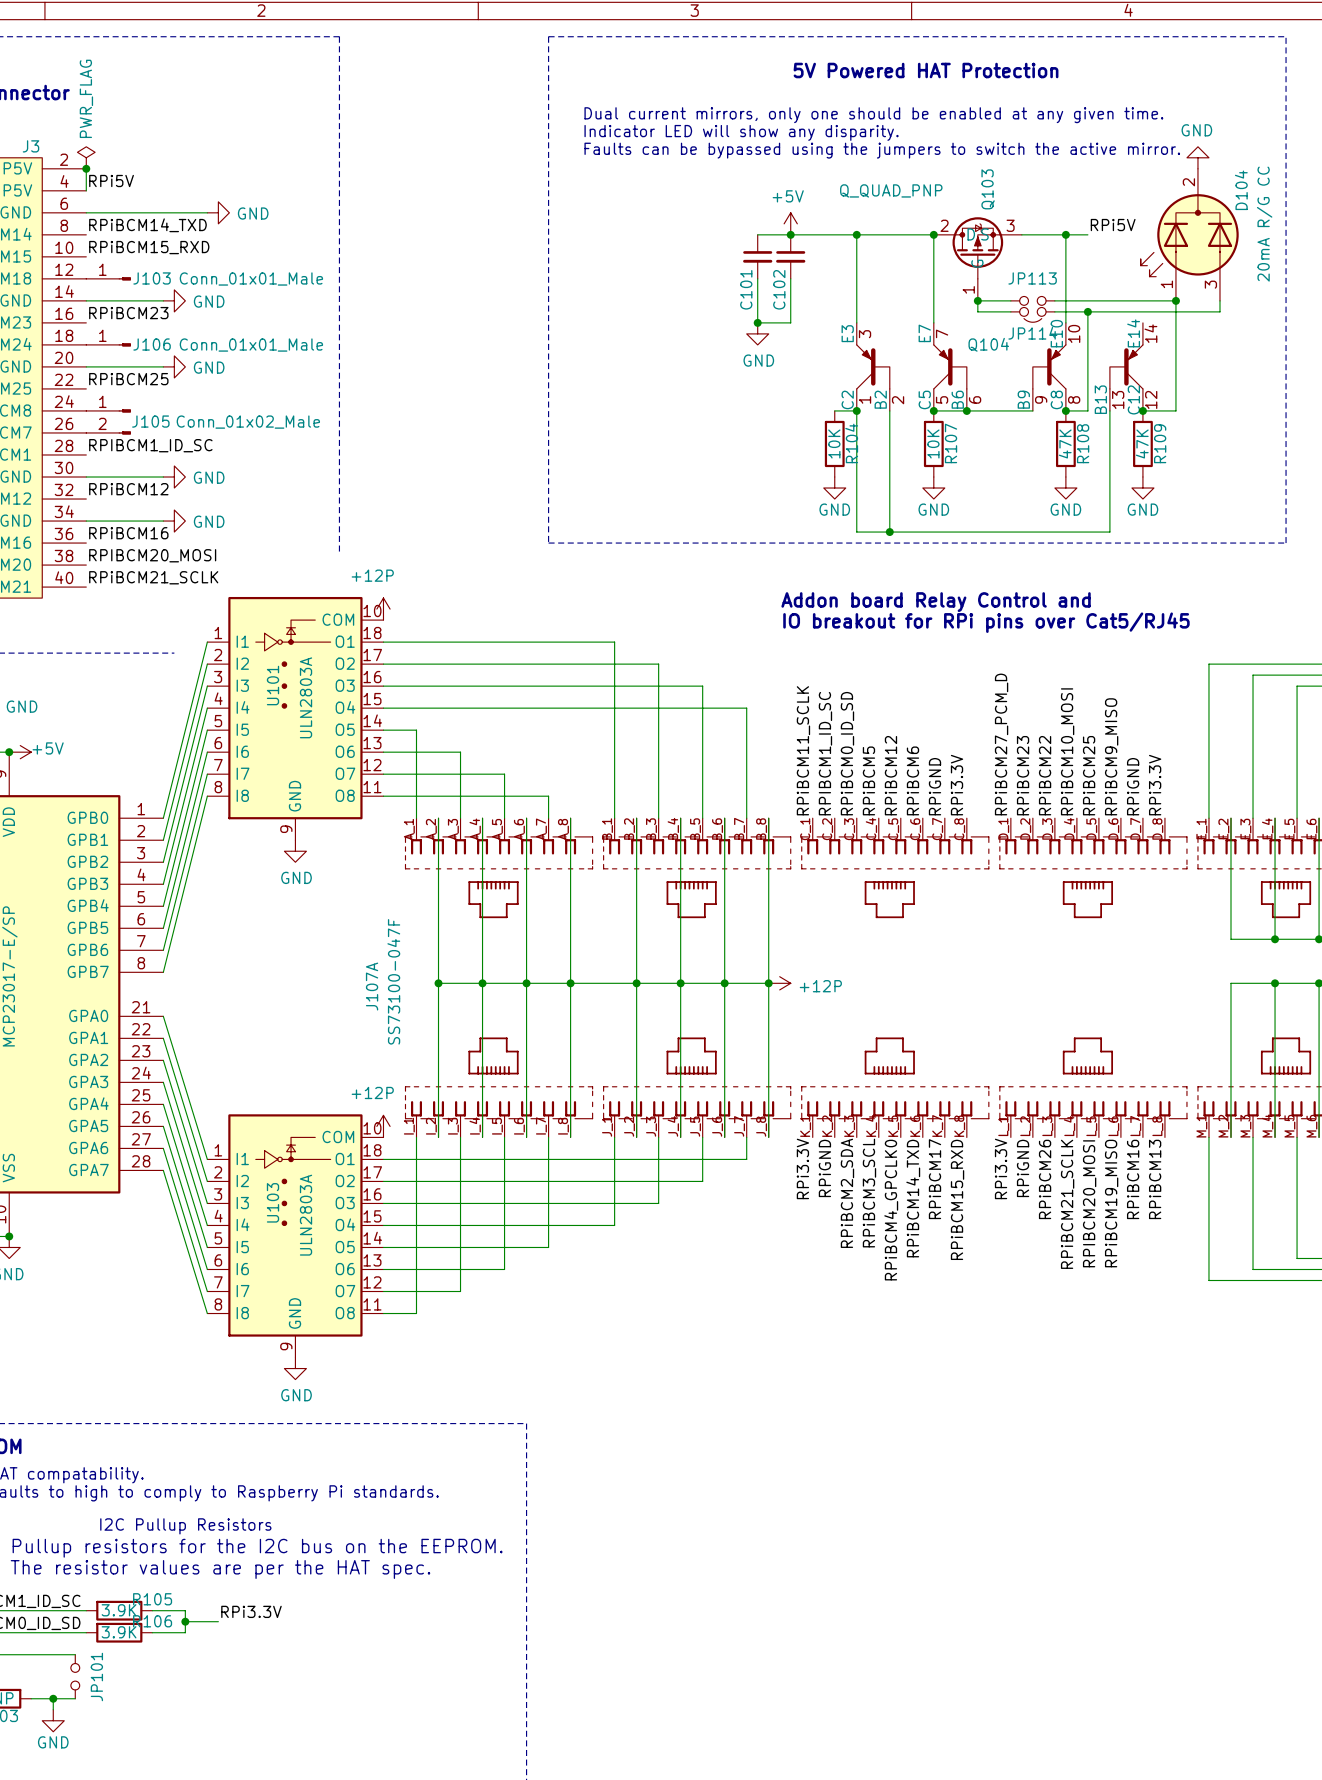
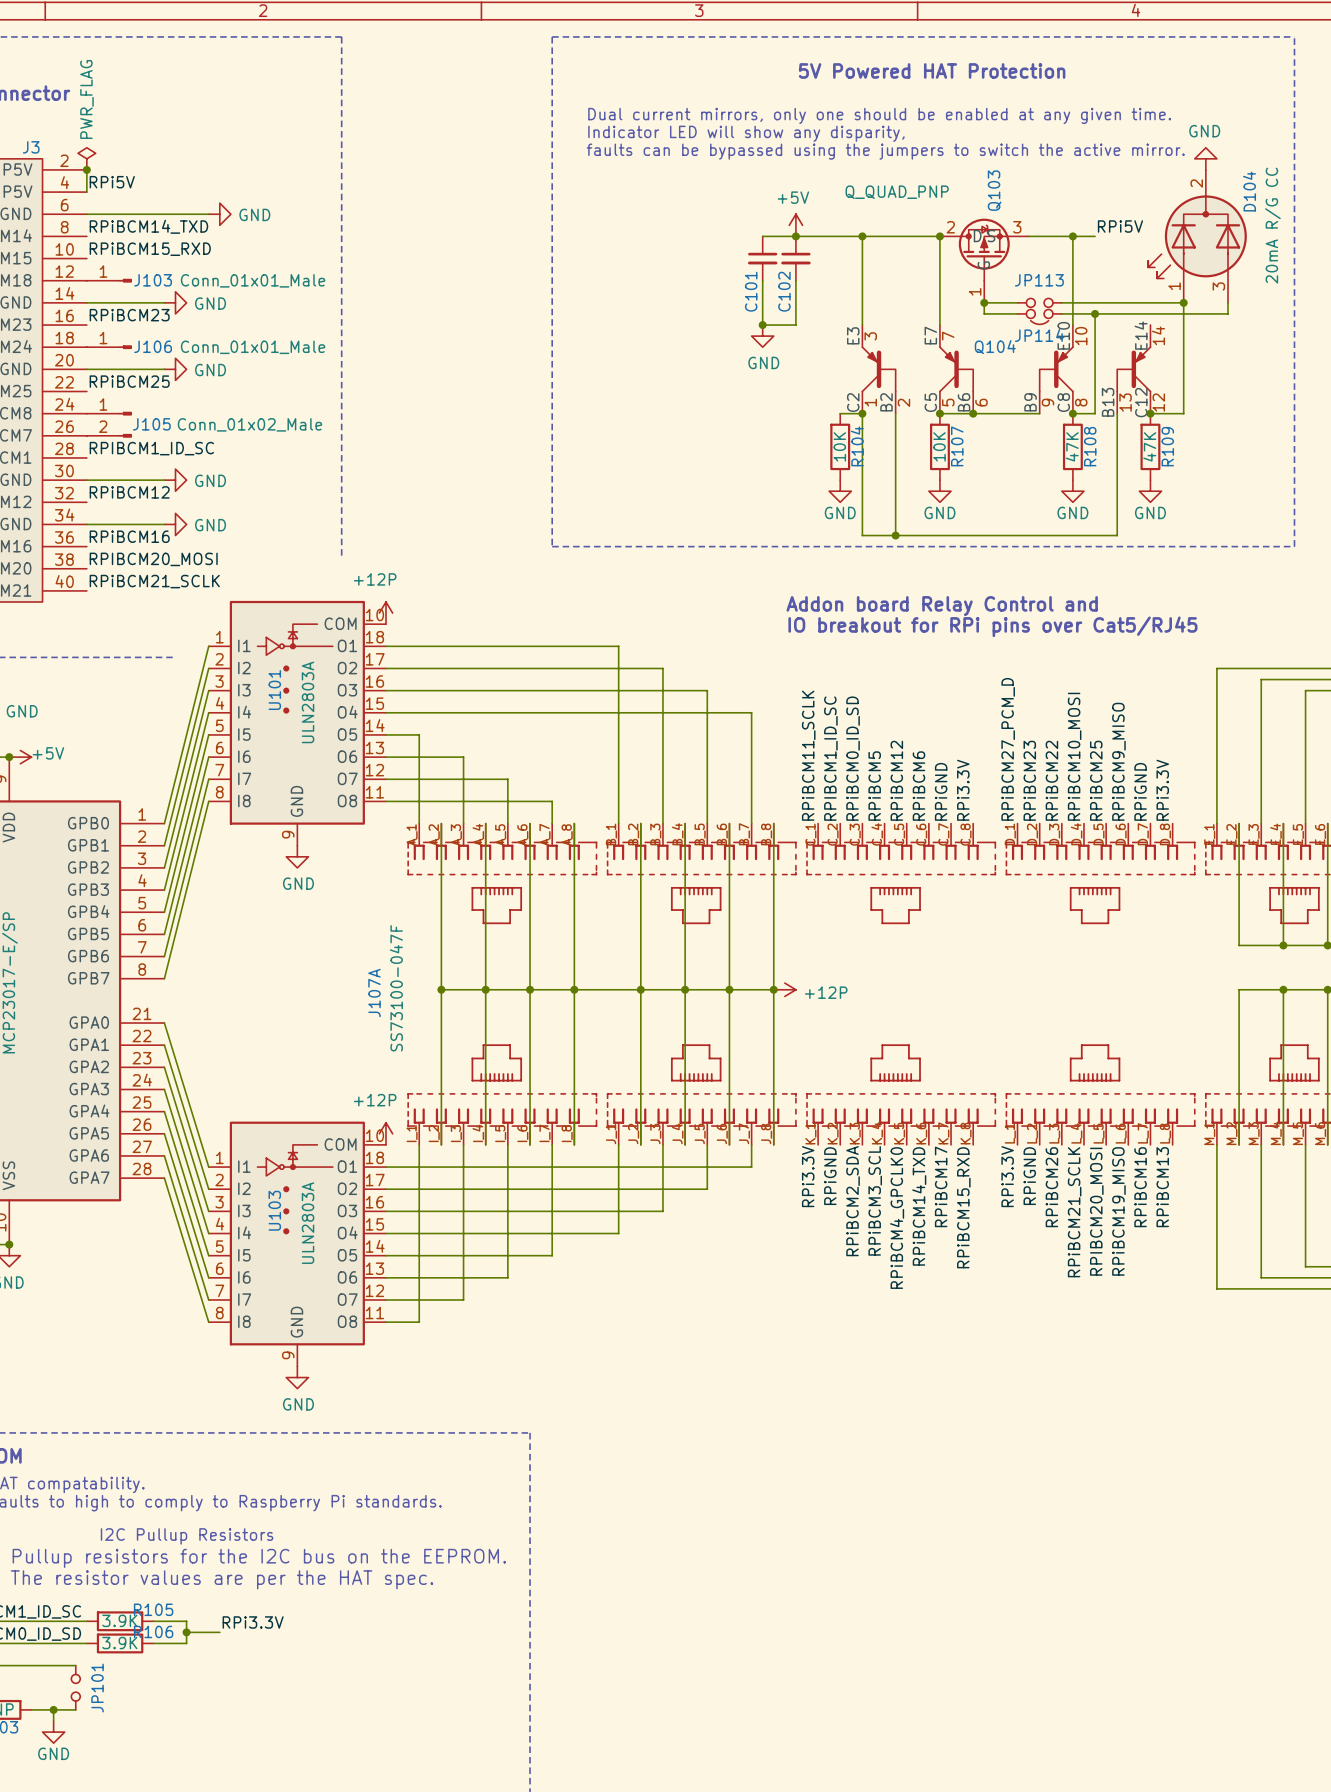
text: Indicator LED will show any disparity. (741, 132) -> Indicator LED will show any disparity, (746, 133)
text: Faults can be bypassed using the jumpers to switch the active mirror. (882, 150) -> faults can be bypassed using the jumpers to switch the active mirror. (885, 151)

